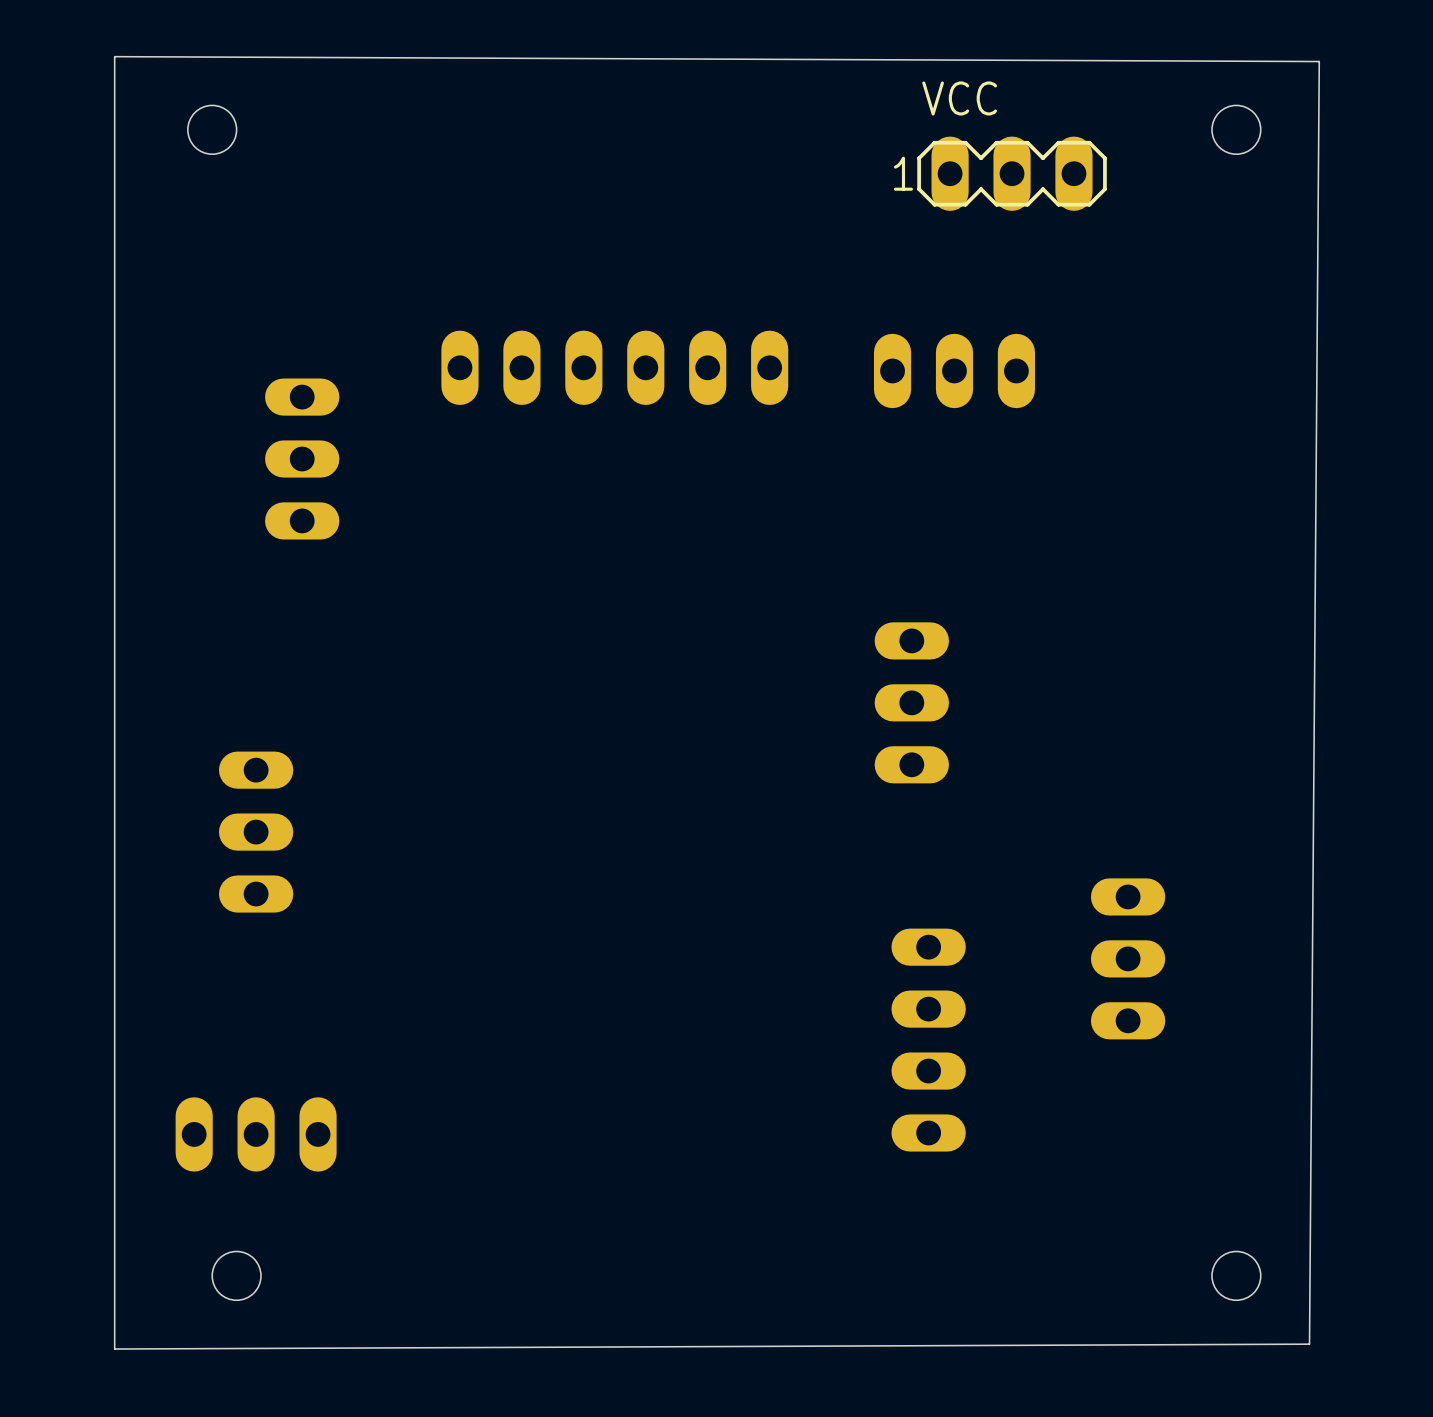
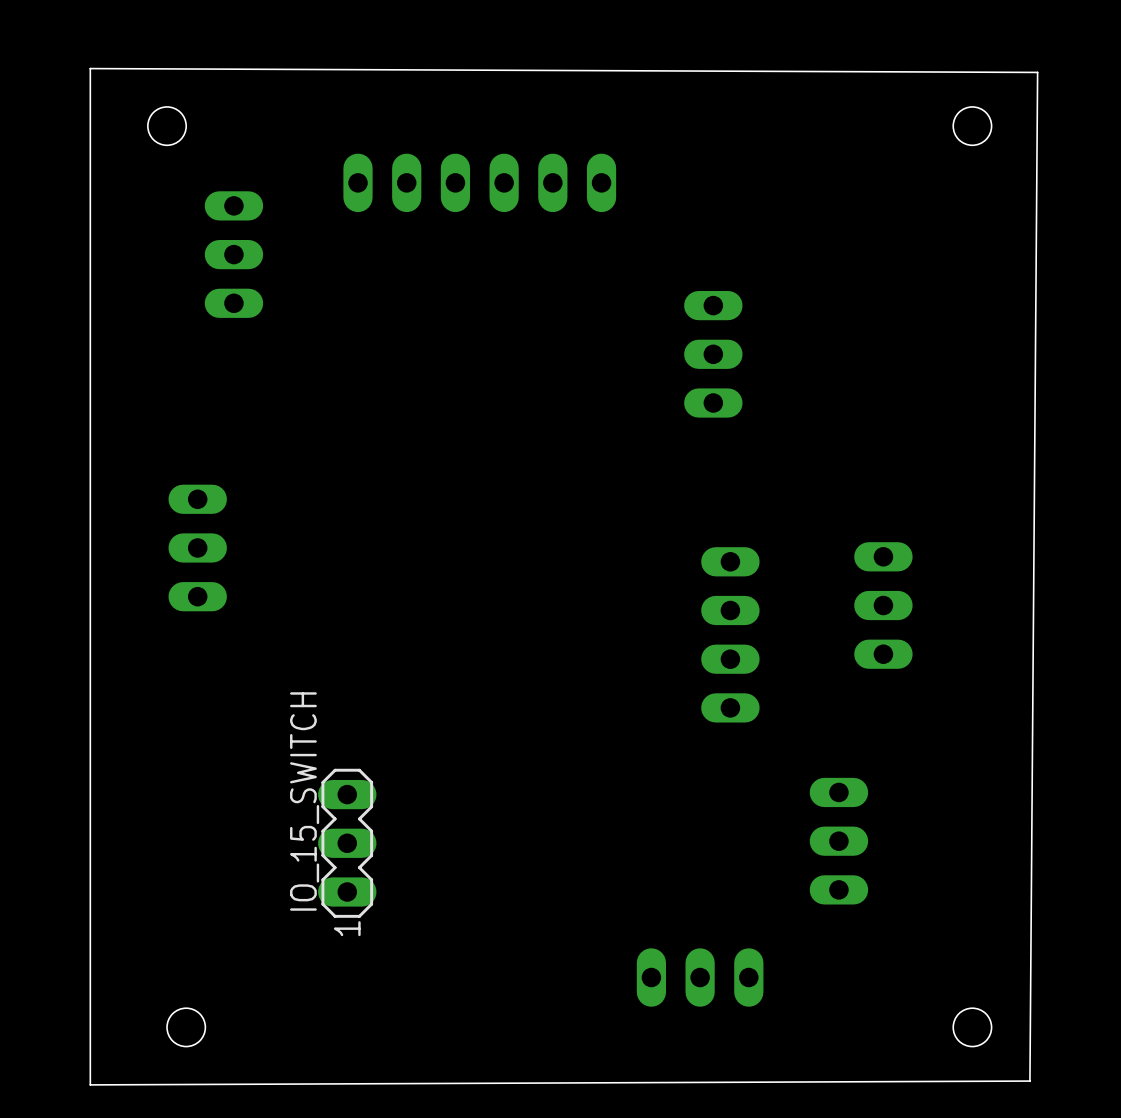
VCC: (1012, 173) -> none
part: none -> (233, 254)
part position: (614, 367) -> (479, 182)
part rotation: 0° (954, 370) -> 90° clockwise (713, 354)
part: (302, 459) -> none
part: none -> (197, 547)
part: (911, 702) -> none
part: none -> (883, 605)
part: (256, 832) -> none
part position: (1128, 958) -> (838, 841)
part position: (928, 1040) -> (730, 634)
IO_15_SWITCH side: top (256, 1134) -> bottom (347, 843)
part: none -> (700, 977)

